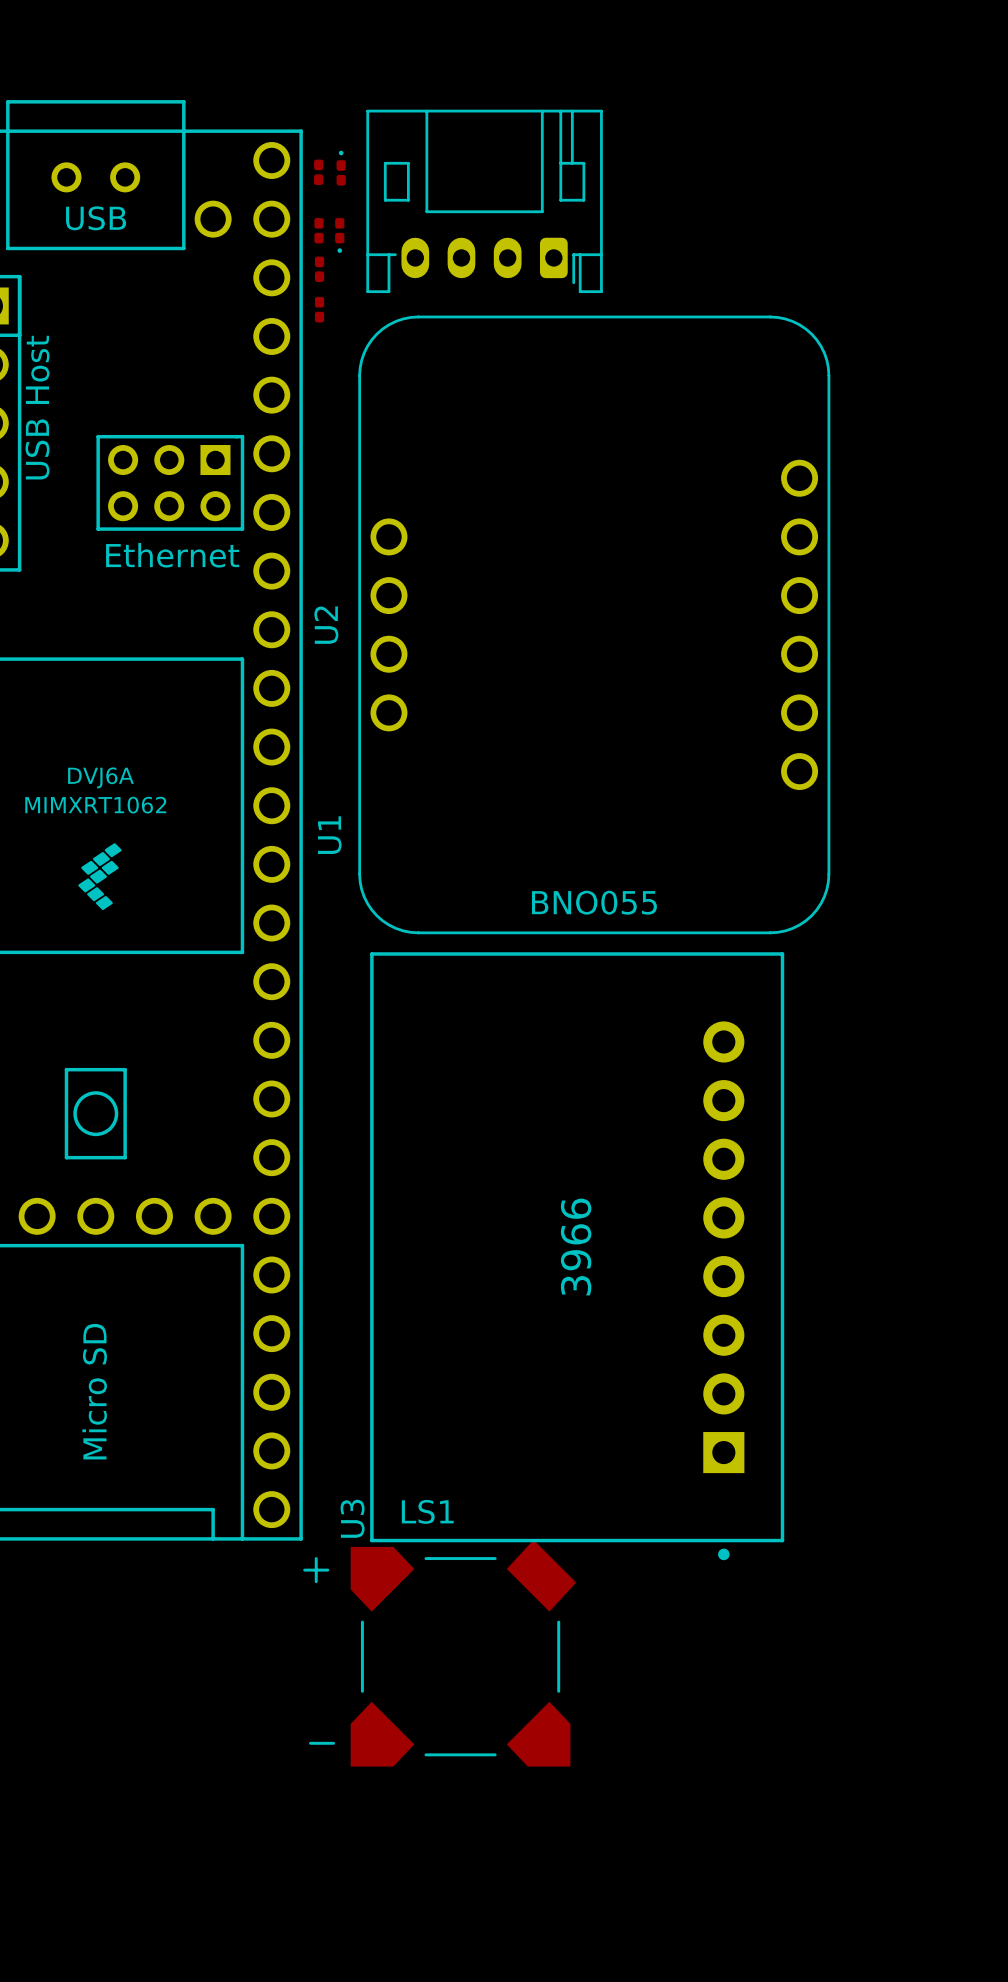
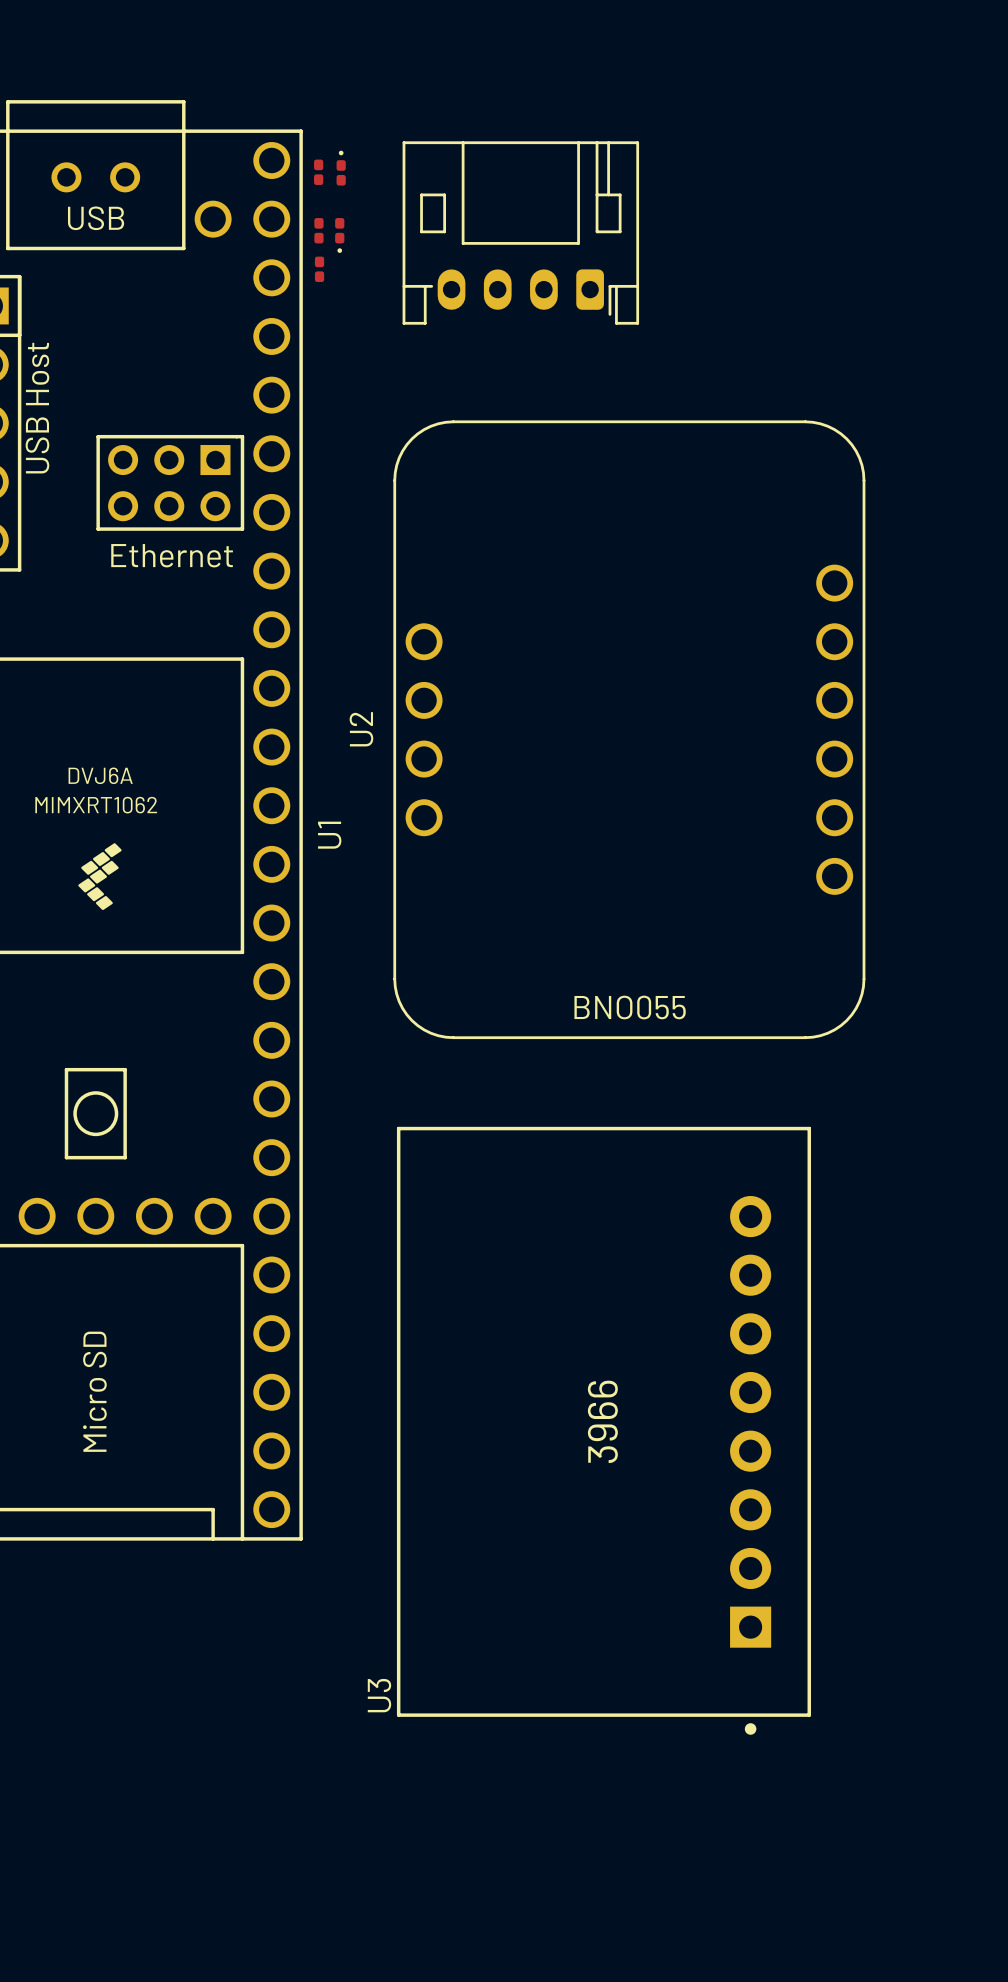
part position: (484, 201) -> (520, 233)
part: (319, 309) -> none
U2 position: (594, 624) -> (629, 729)
U3 position: (577, 1256) -> (603, 1430)
LS1: (439, 1653) -> none

